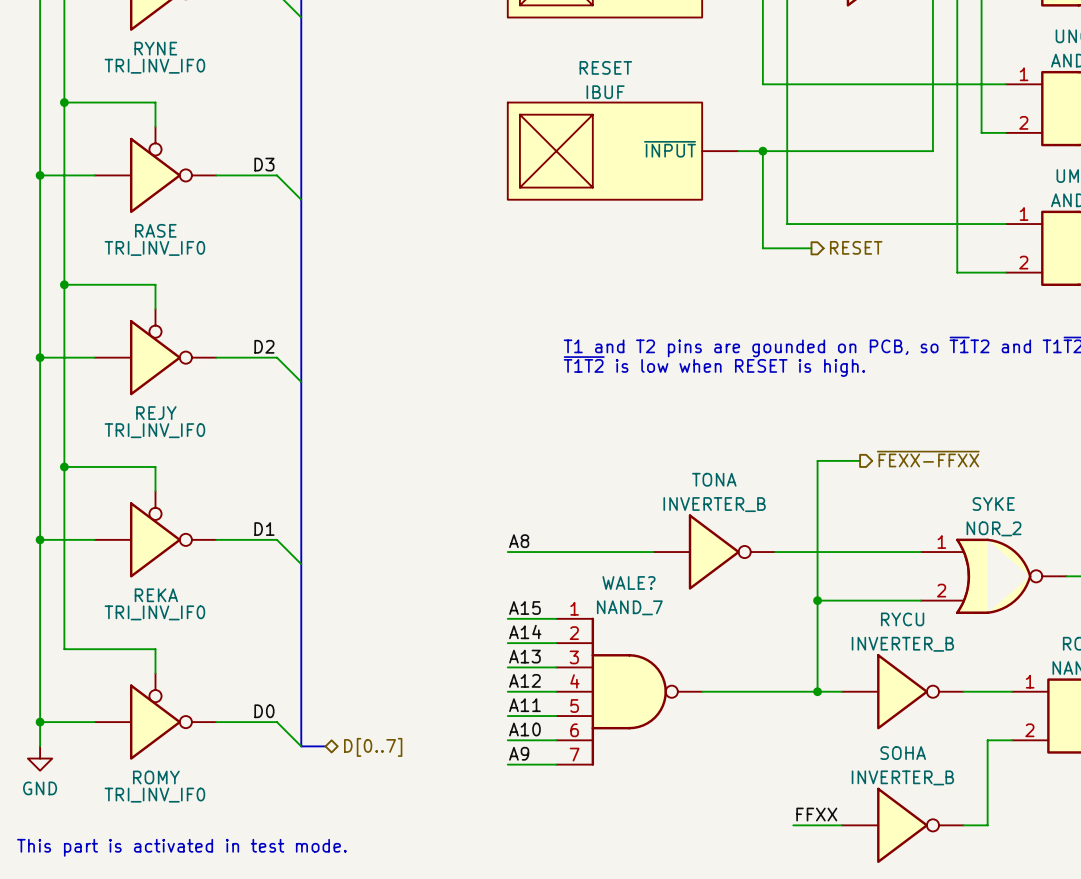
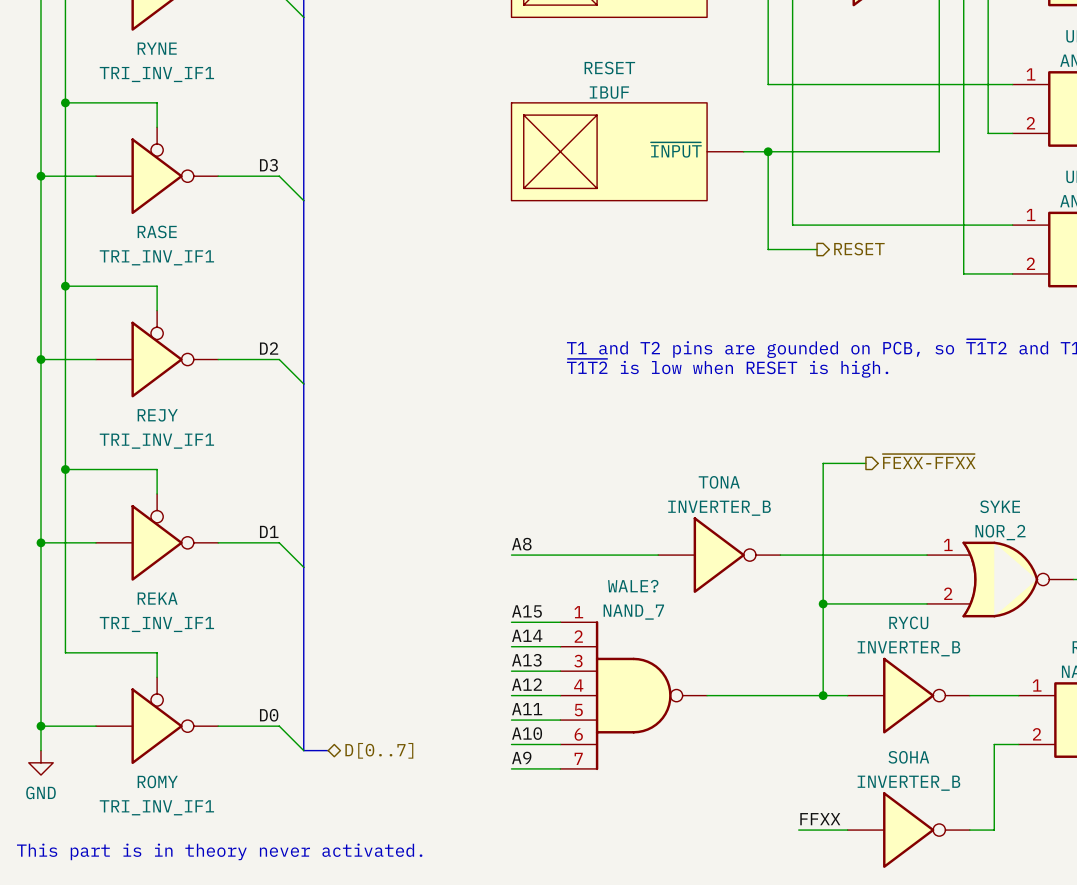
RYNE value: TRI_INV_IF0 (154, 66) -> TRI_INV_IF1 (156, 74)
RASE value: TRI_INV_IF0 (154, 248) -> TRI_INV_IF1 (156, 257)
REJY value: TRI_INV_IF0 (154, 430) -> TRI_INV_IF1 (156, 441)
REKA value: TRI_INV_IF0 (154, 612) -> TRI_INV_IF1 (156, 624)
ROMY value: TRI_INV_IF0 (154, 795) -> TRI_INV_IF1 (156, 807)
text: This part is activated in test mode. (181, 847) -> This part is in theory never activated. (219, 851)

